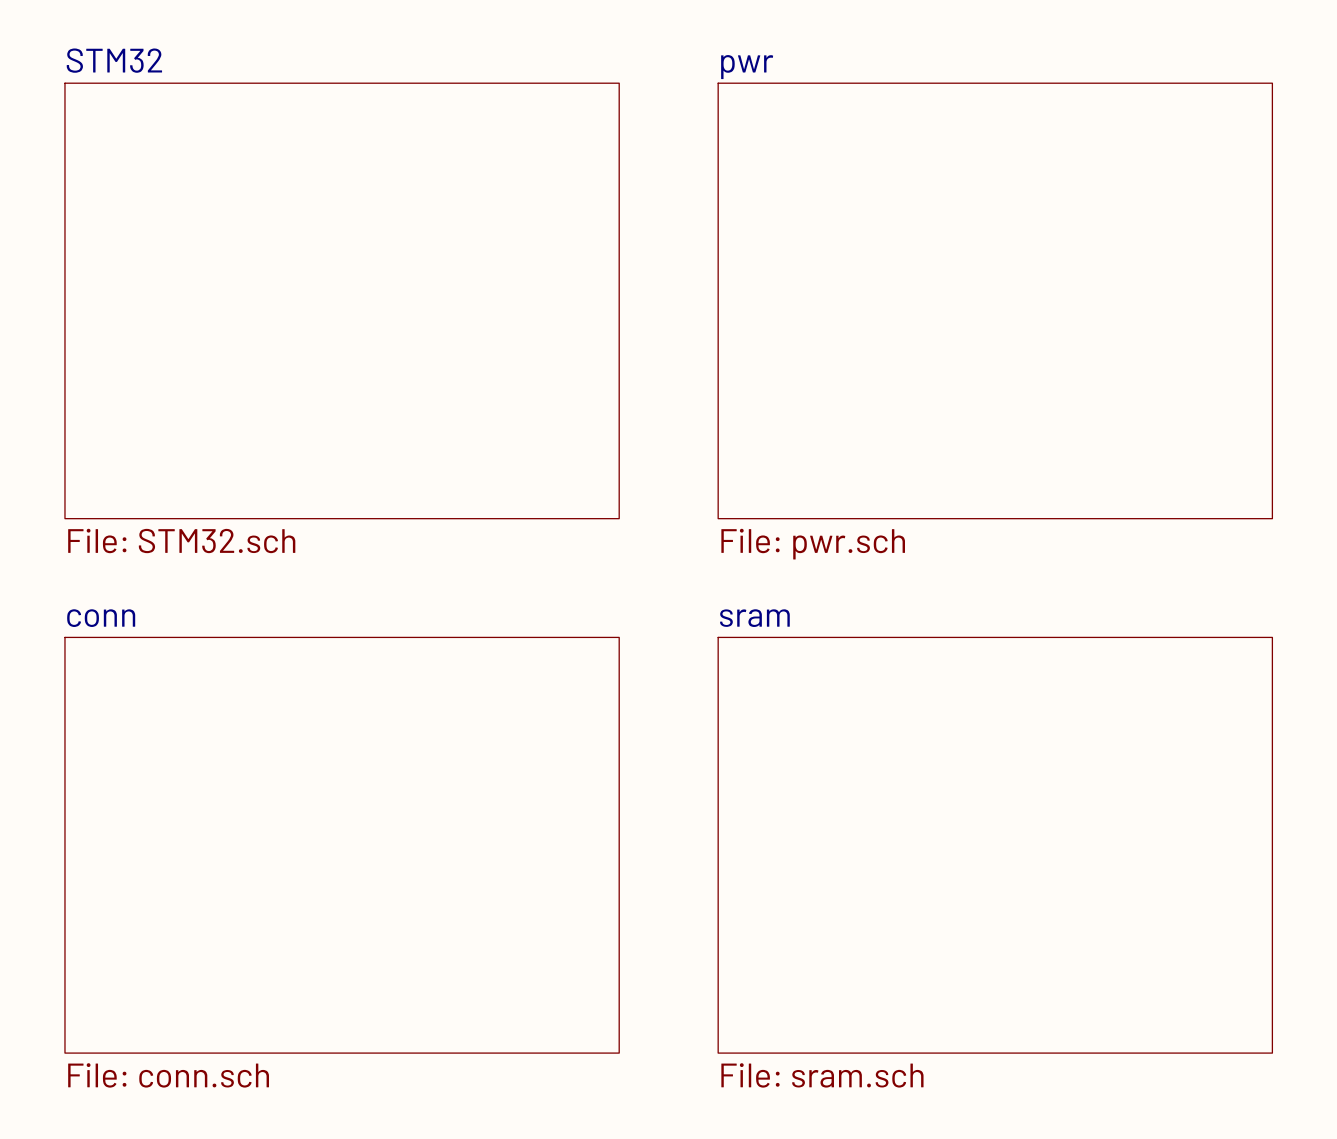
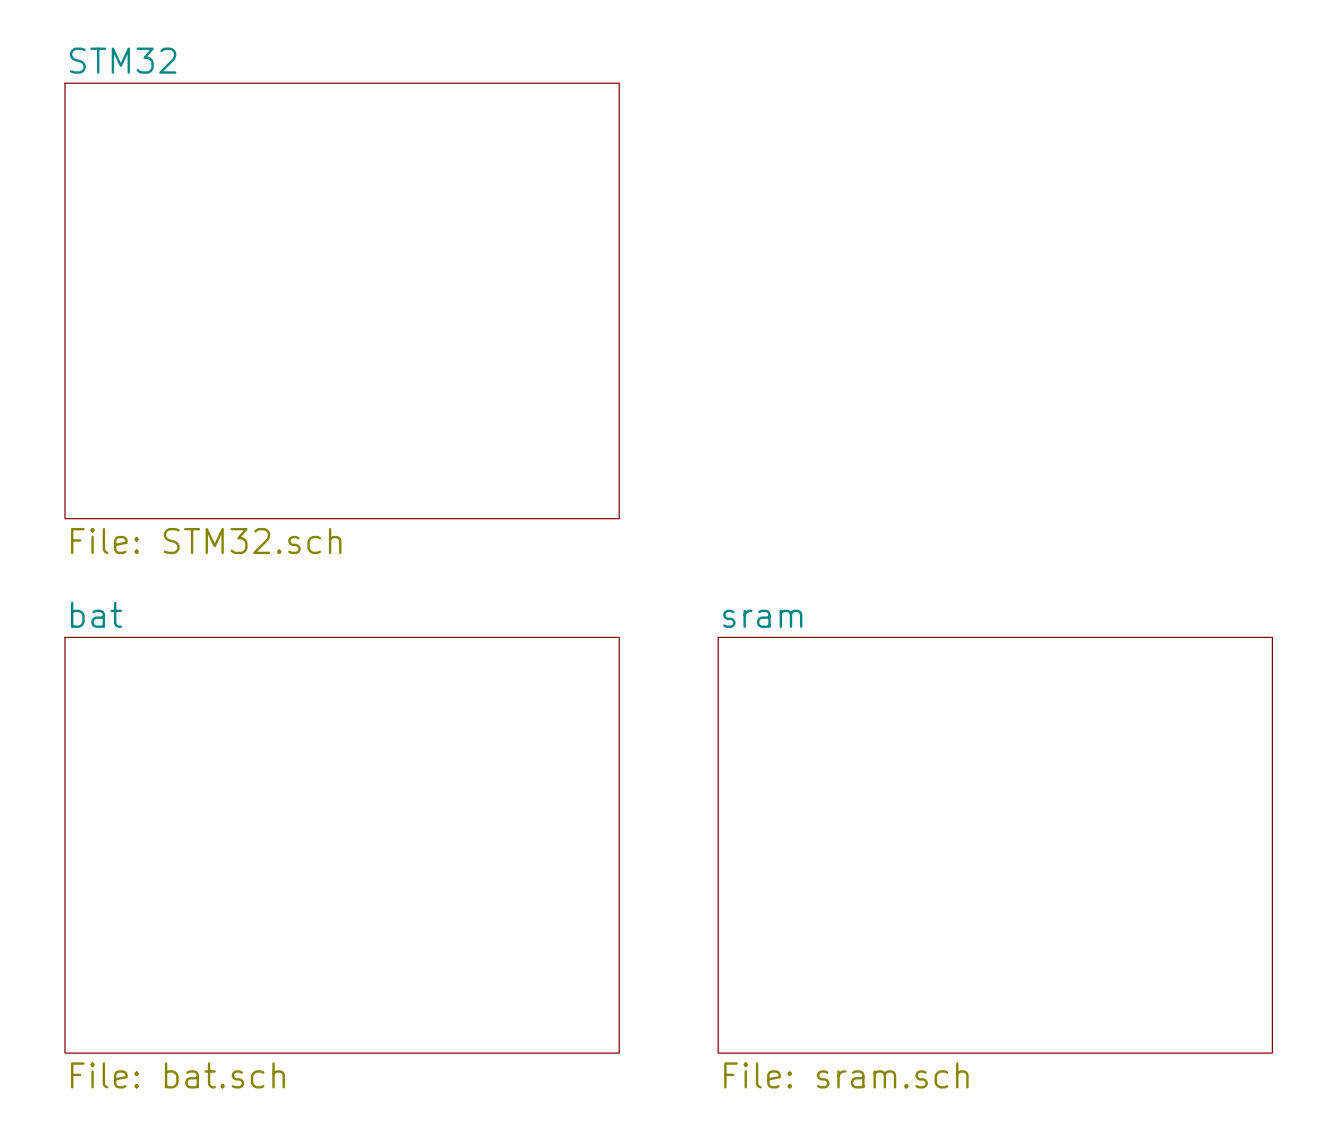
sheet pwr: File: pwr.sch (995, 300) -> none
sheet conn name: conn (101, 618) -> bat (96, 614)
sheet conn value: File: conn.sch (168, 1075) -> File: bat.sch (177, 1075)

